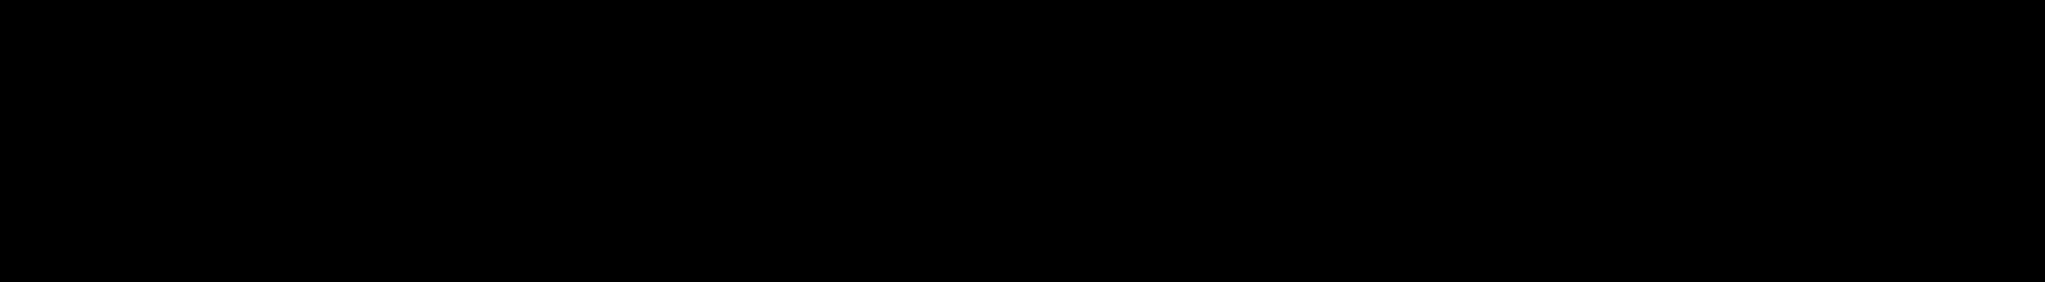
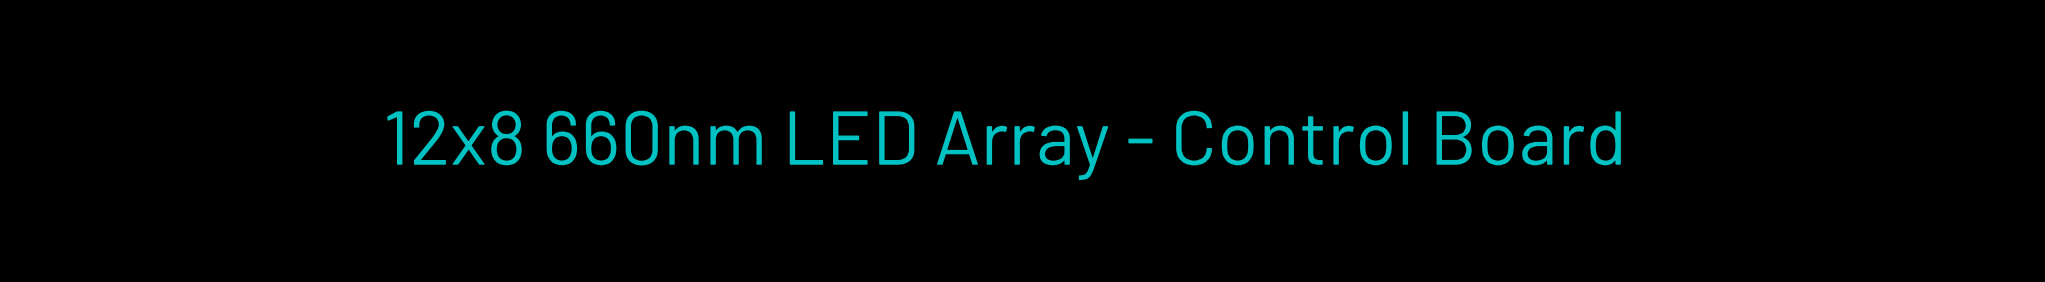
text: none -> 12x8 660nm LED Array - Control Board (1004, 145)

